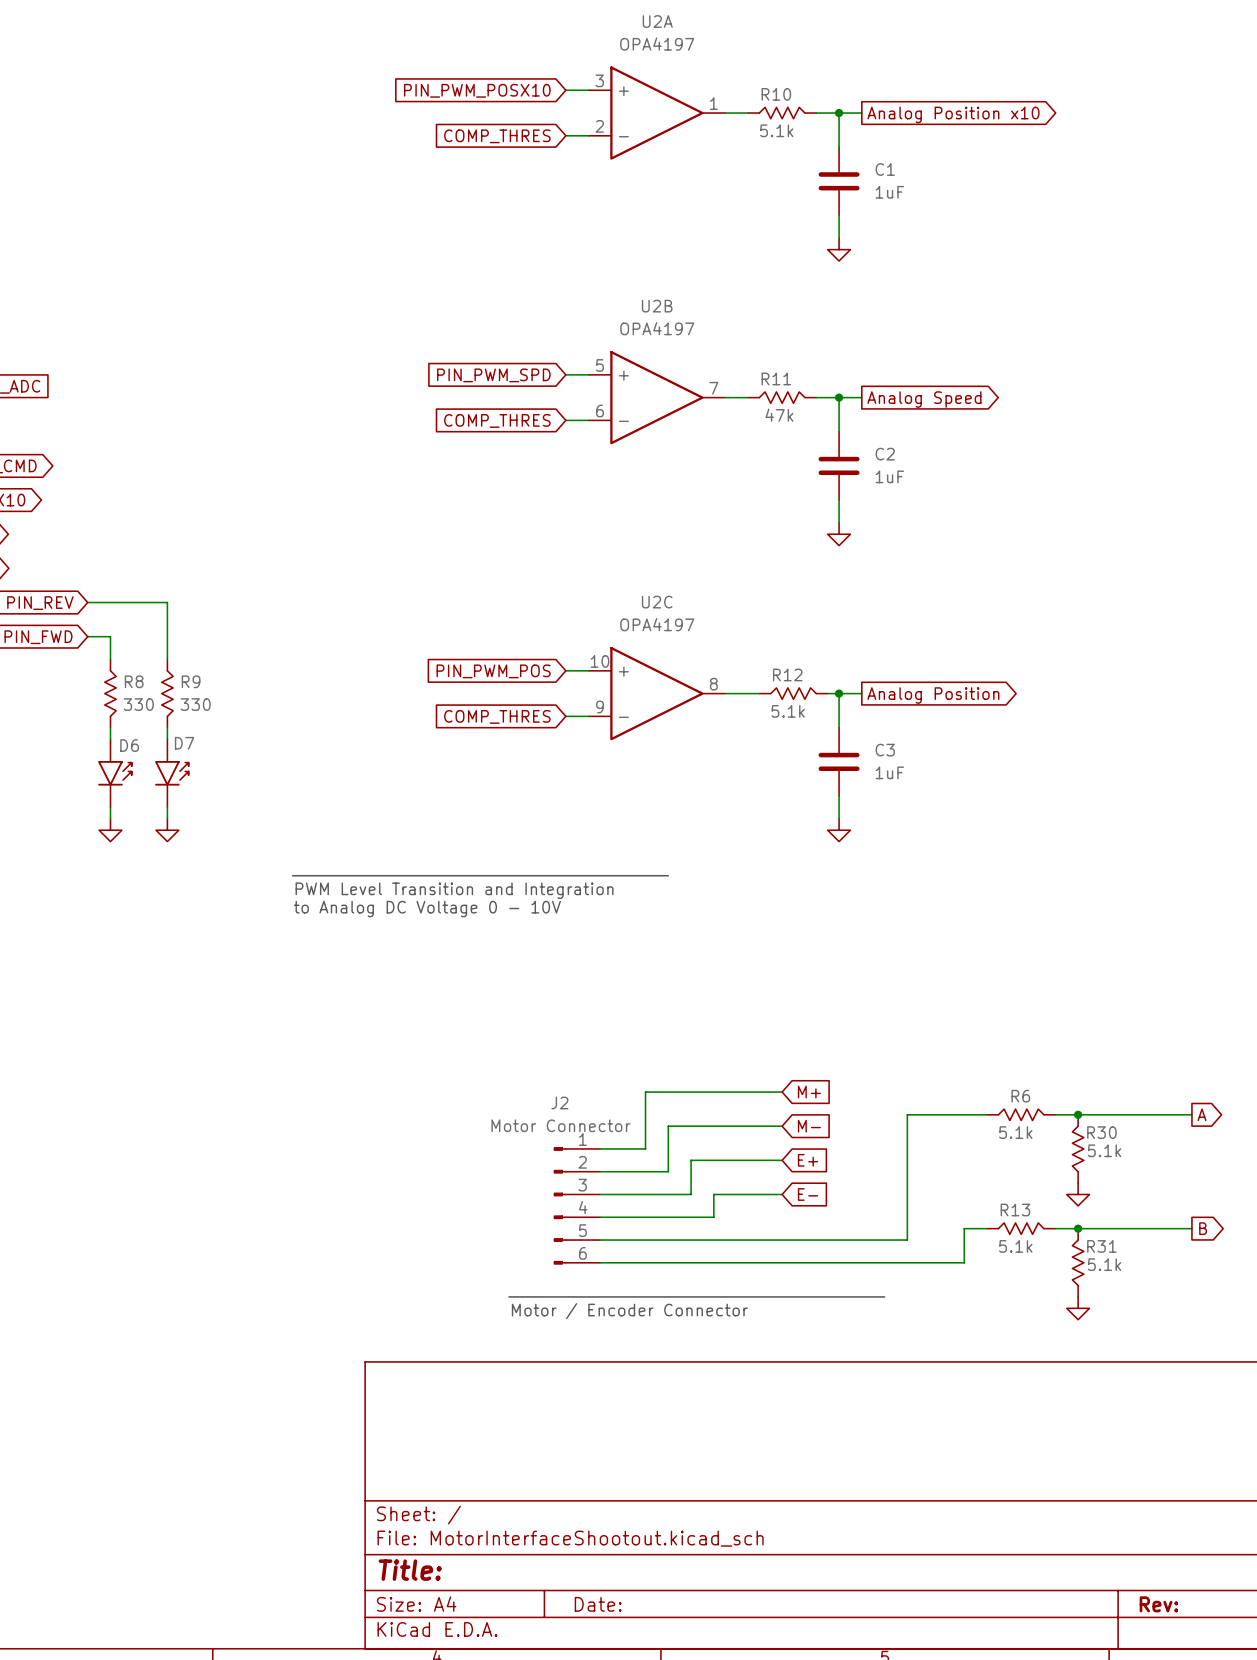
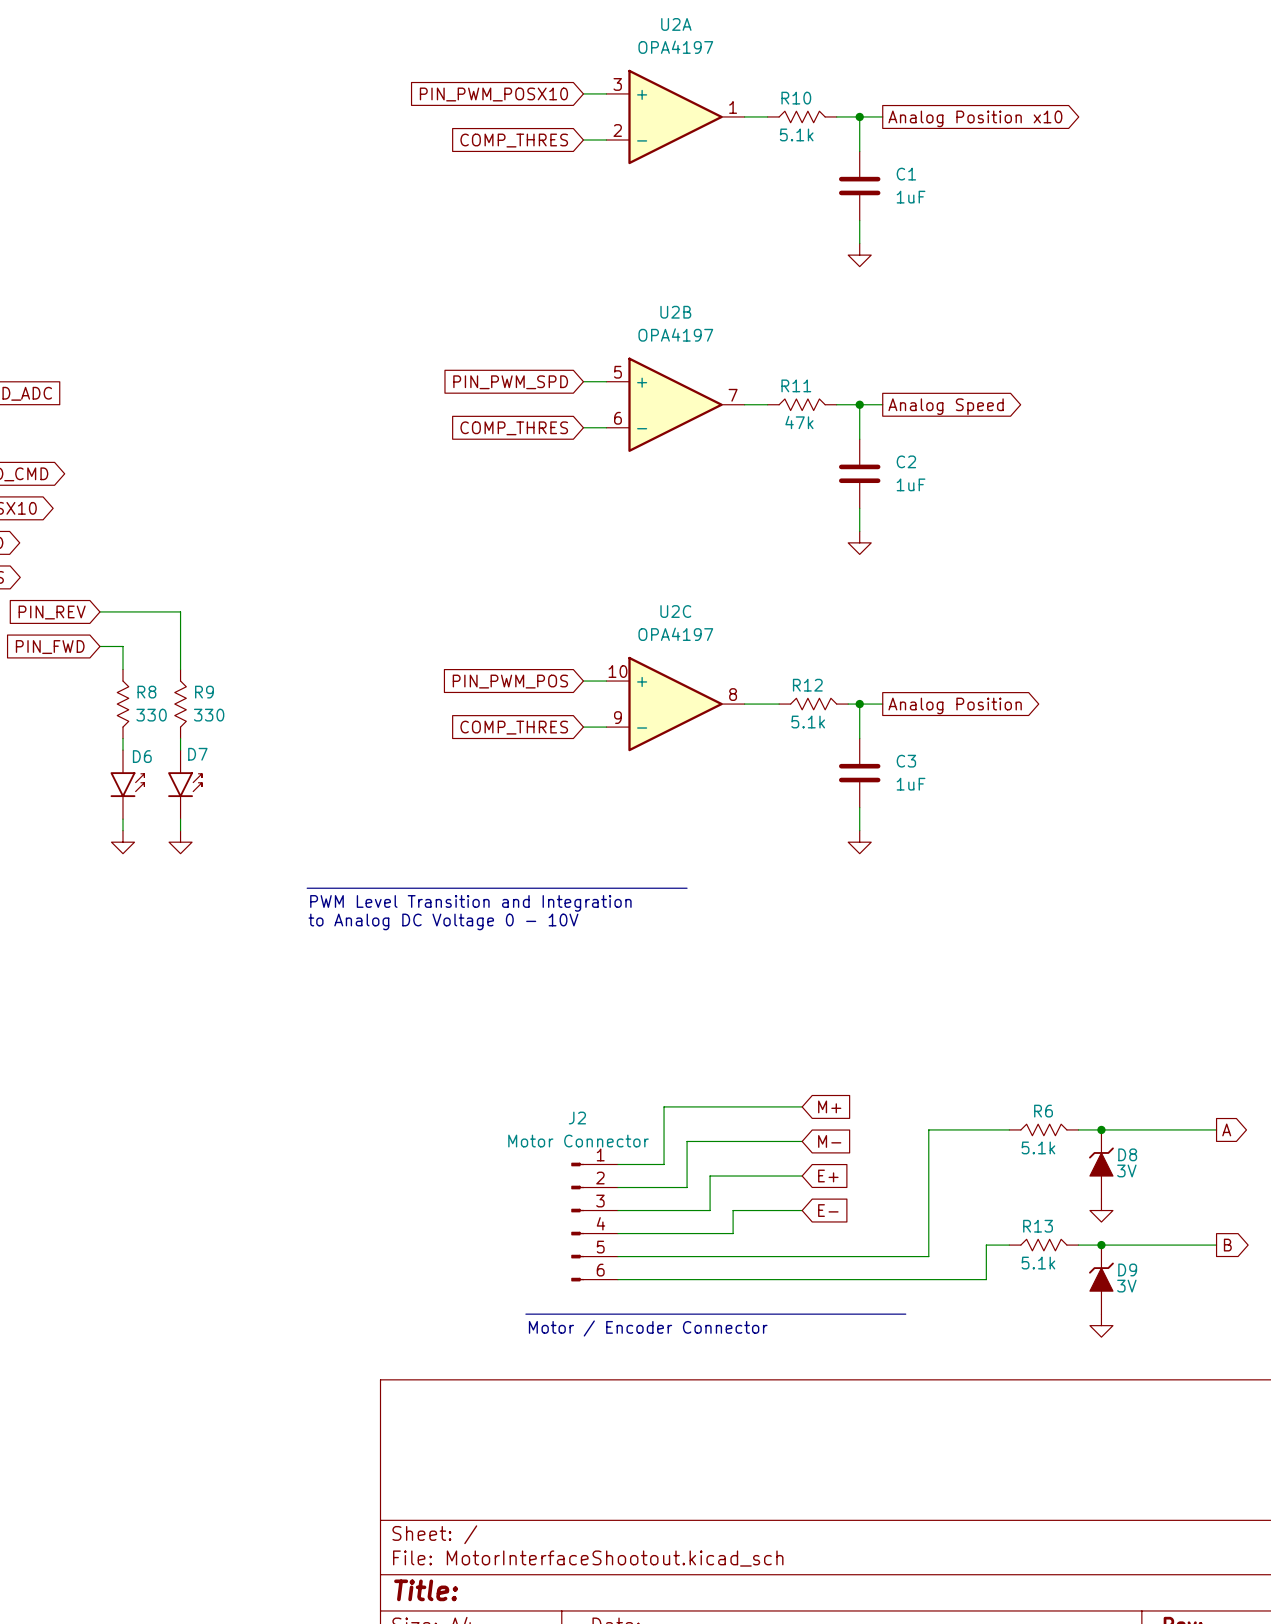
R30: 5.1k (1078, 1148) -> none
D8: none -> 3V (1101, 1164)
R31: 5.1k (1078, 1262) -> none
D9: none -> 3V (1101, 1279)

